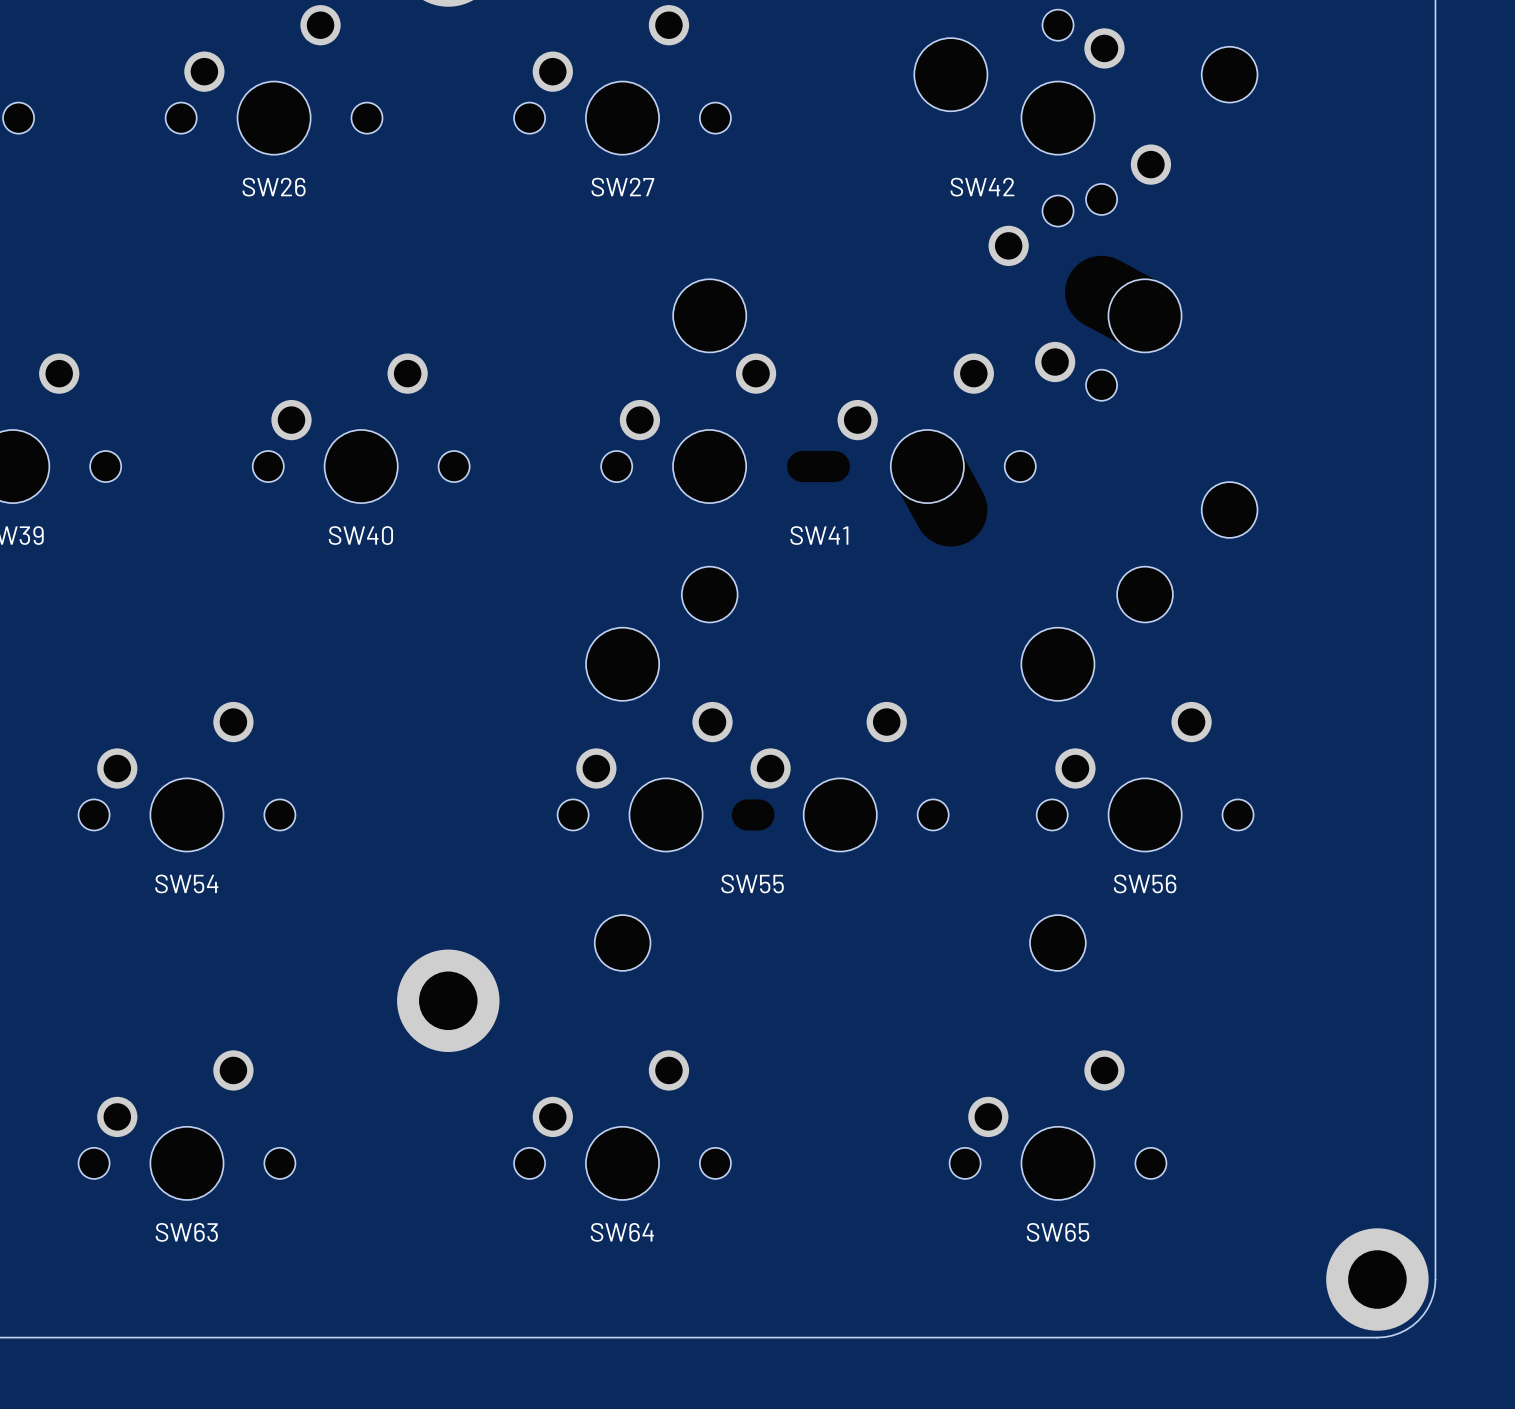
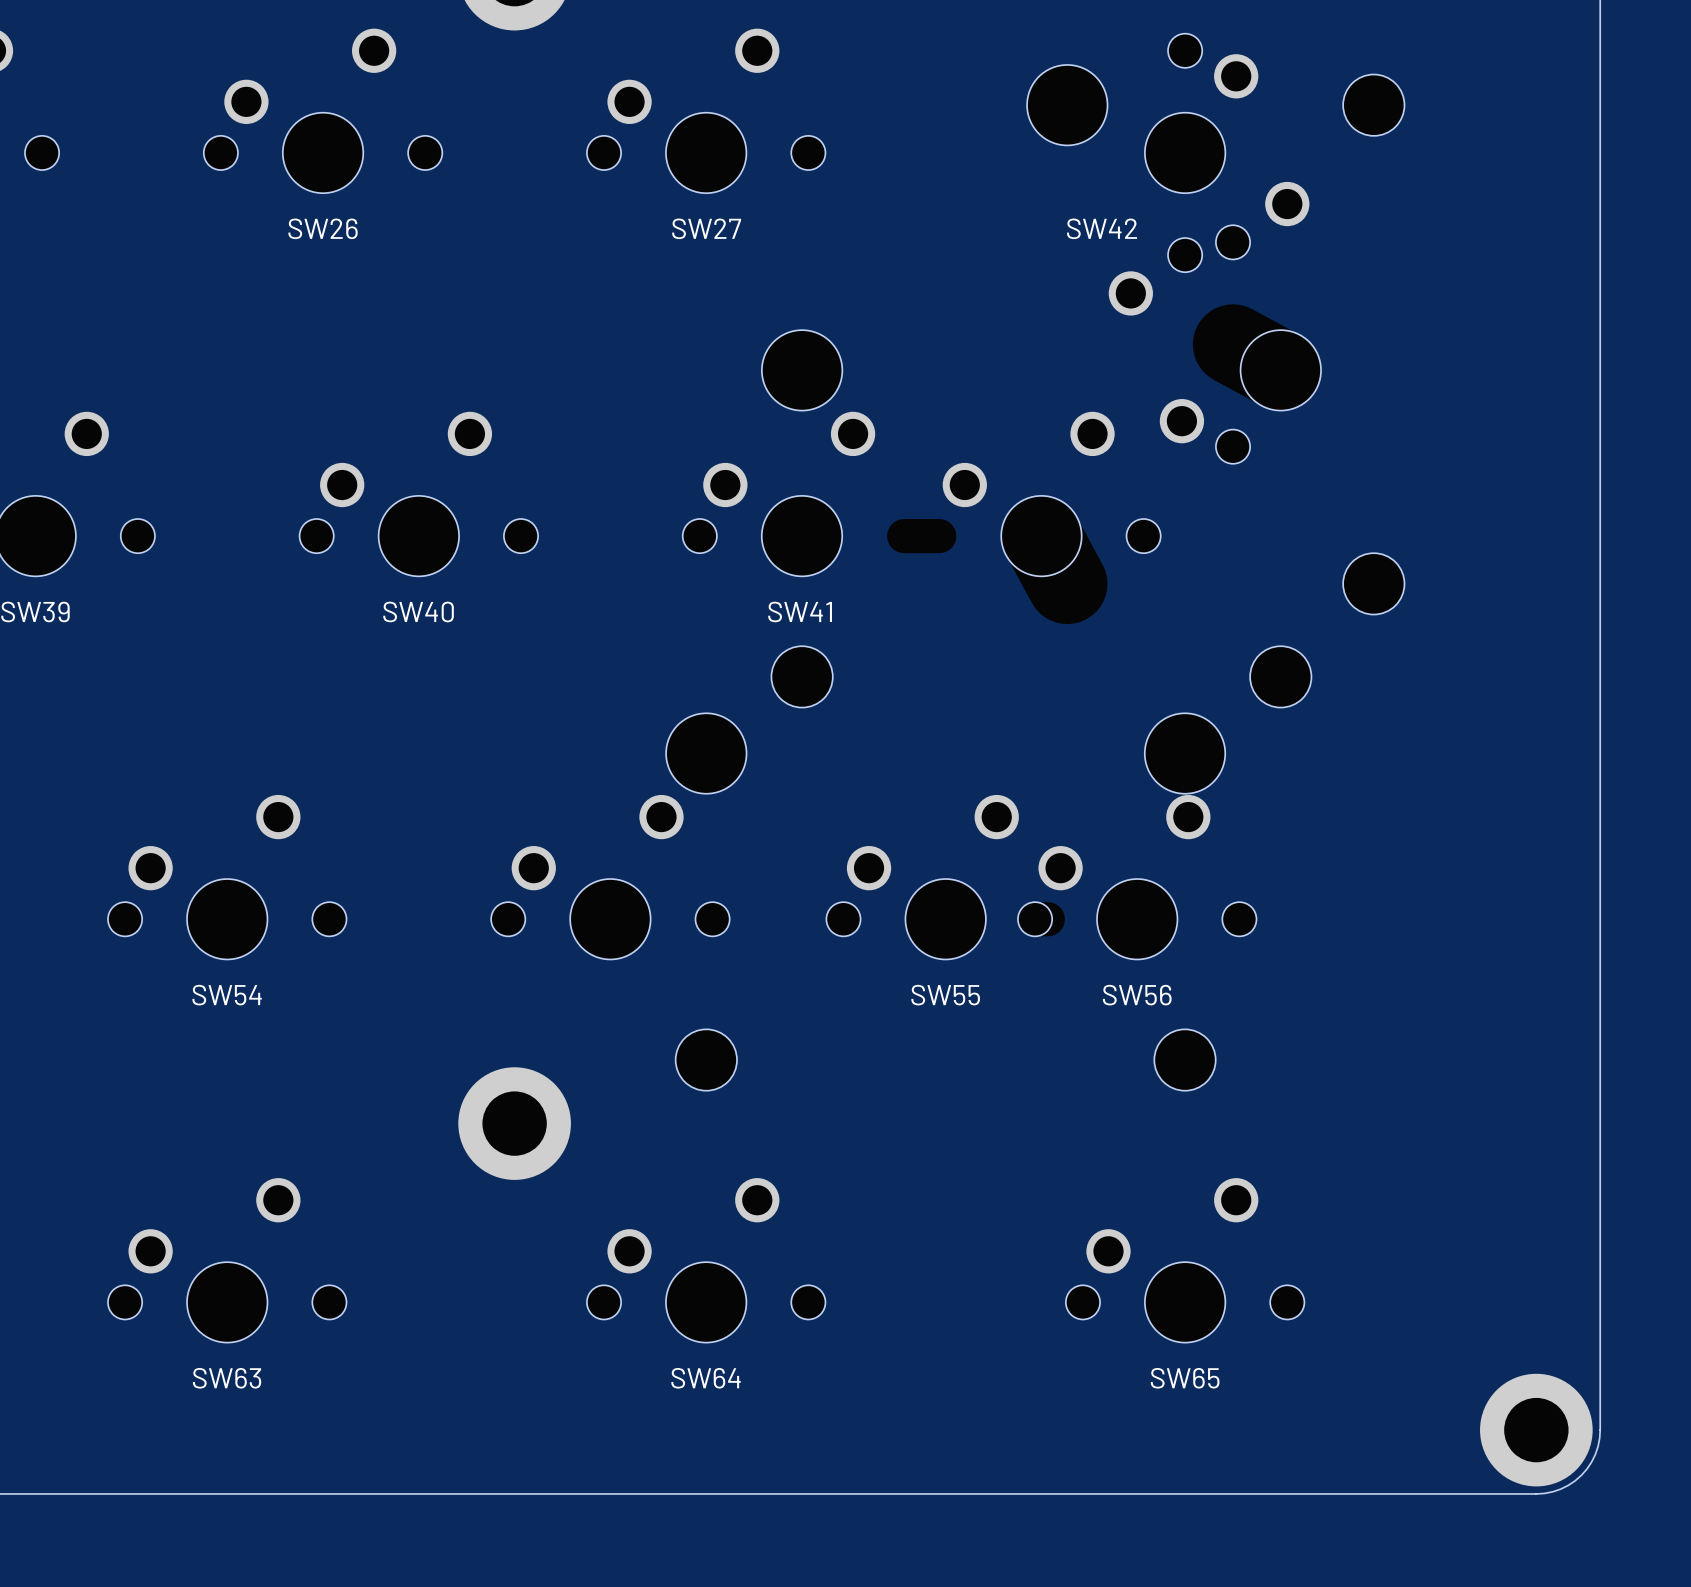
SW41 name position: SW41 (819, 535) -> SW41 (800, 611)
SW55 footprint: [557, 627, 1095, 971] -> [491, 713, 1226, 1091]
SW56 position: (1145, 776) -> (1137, 877)
SW55 name position: SW55 (752, 883) -> SW55 (945, 995)

